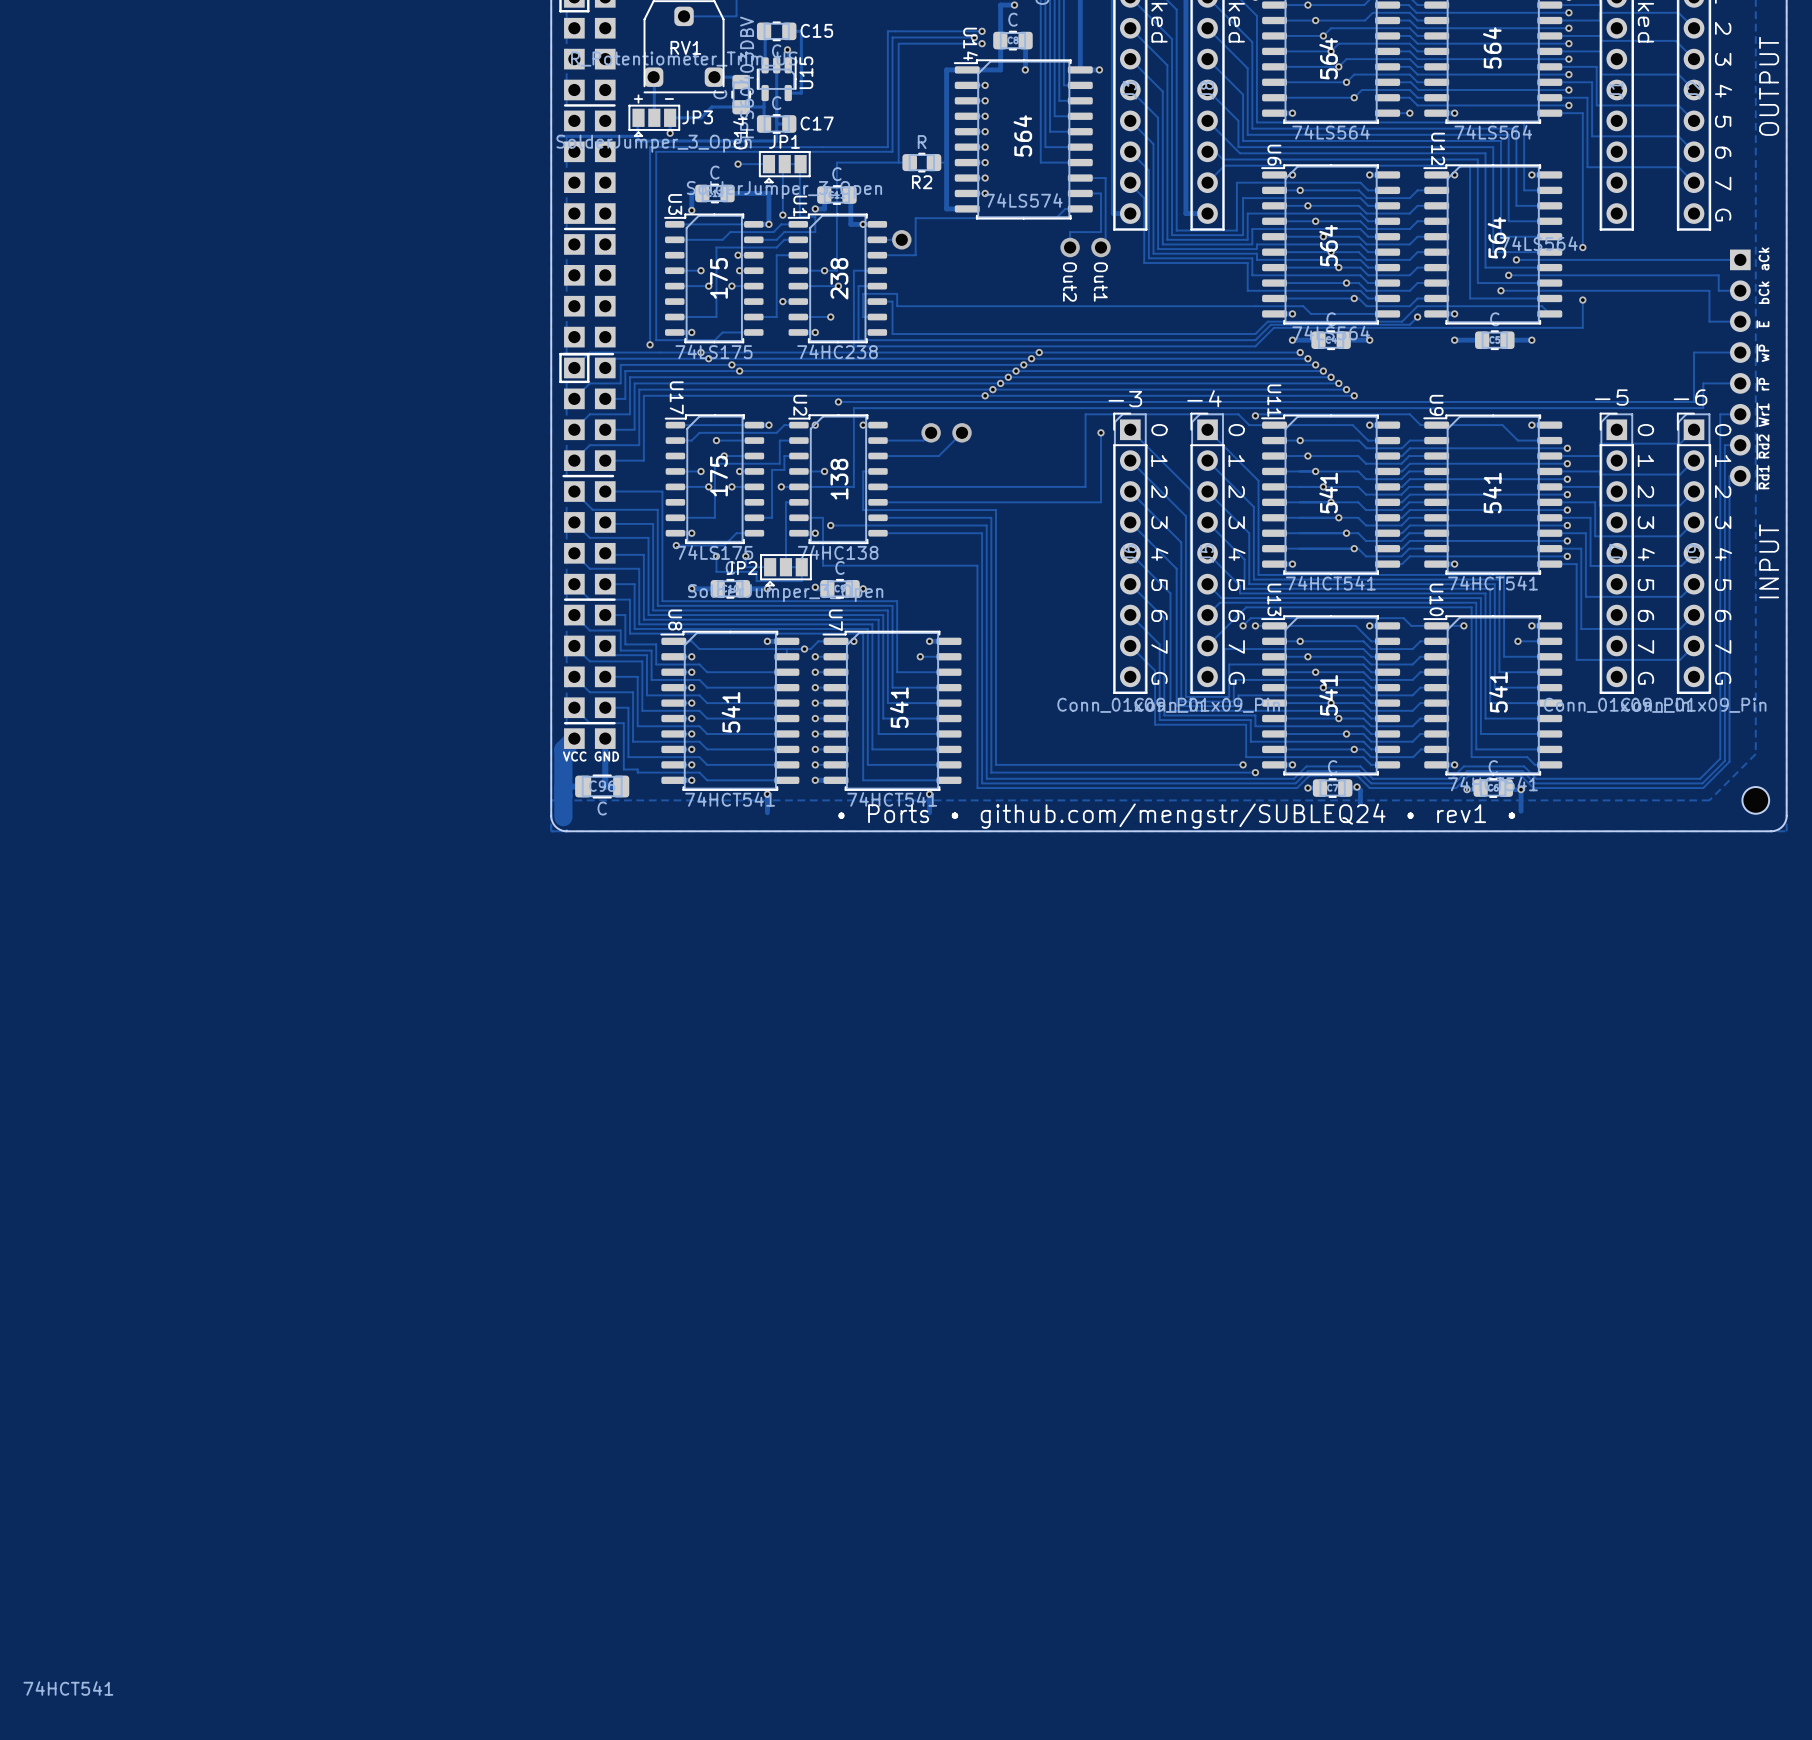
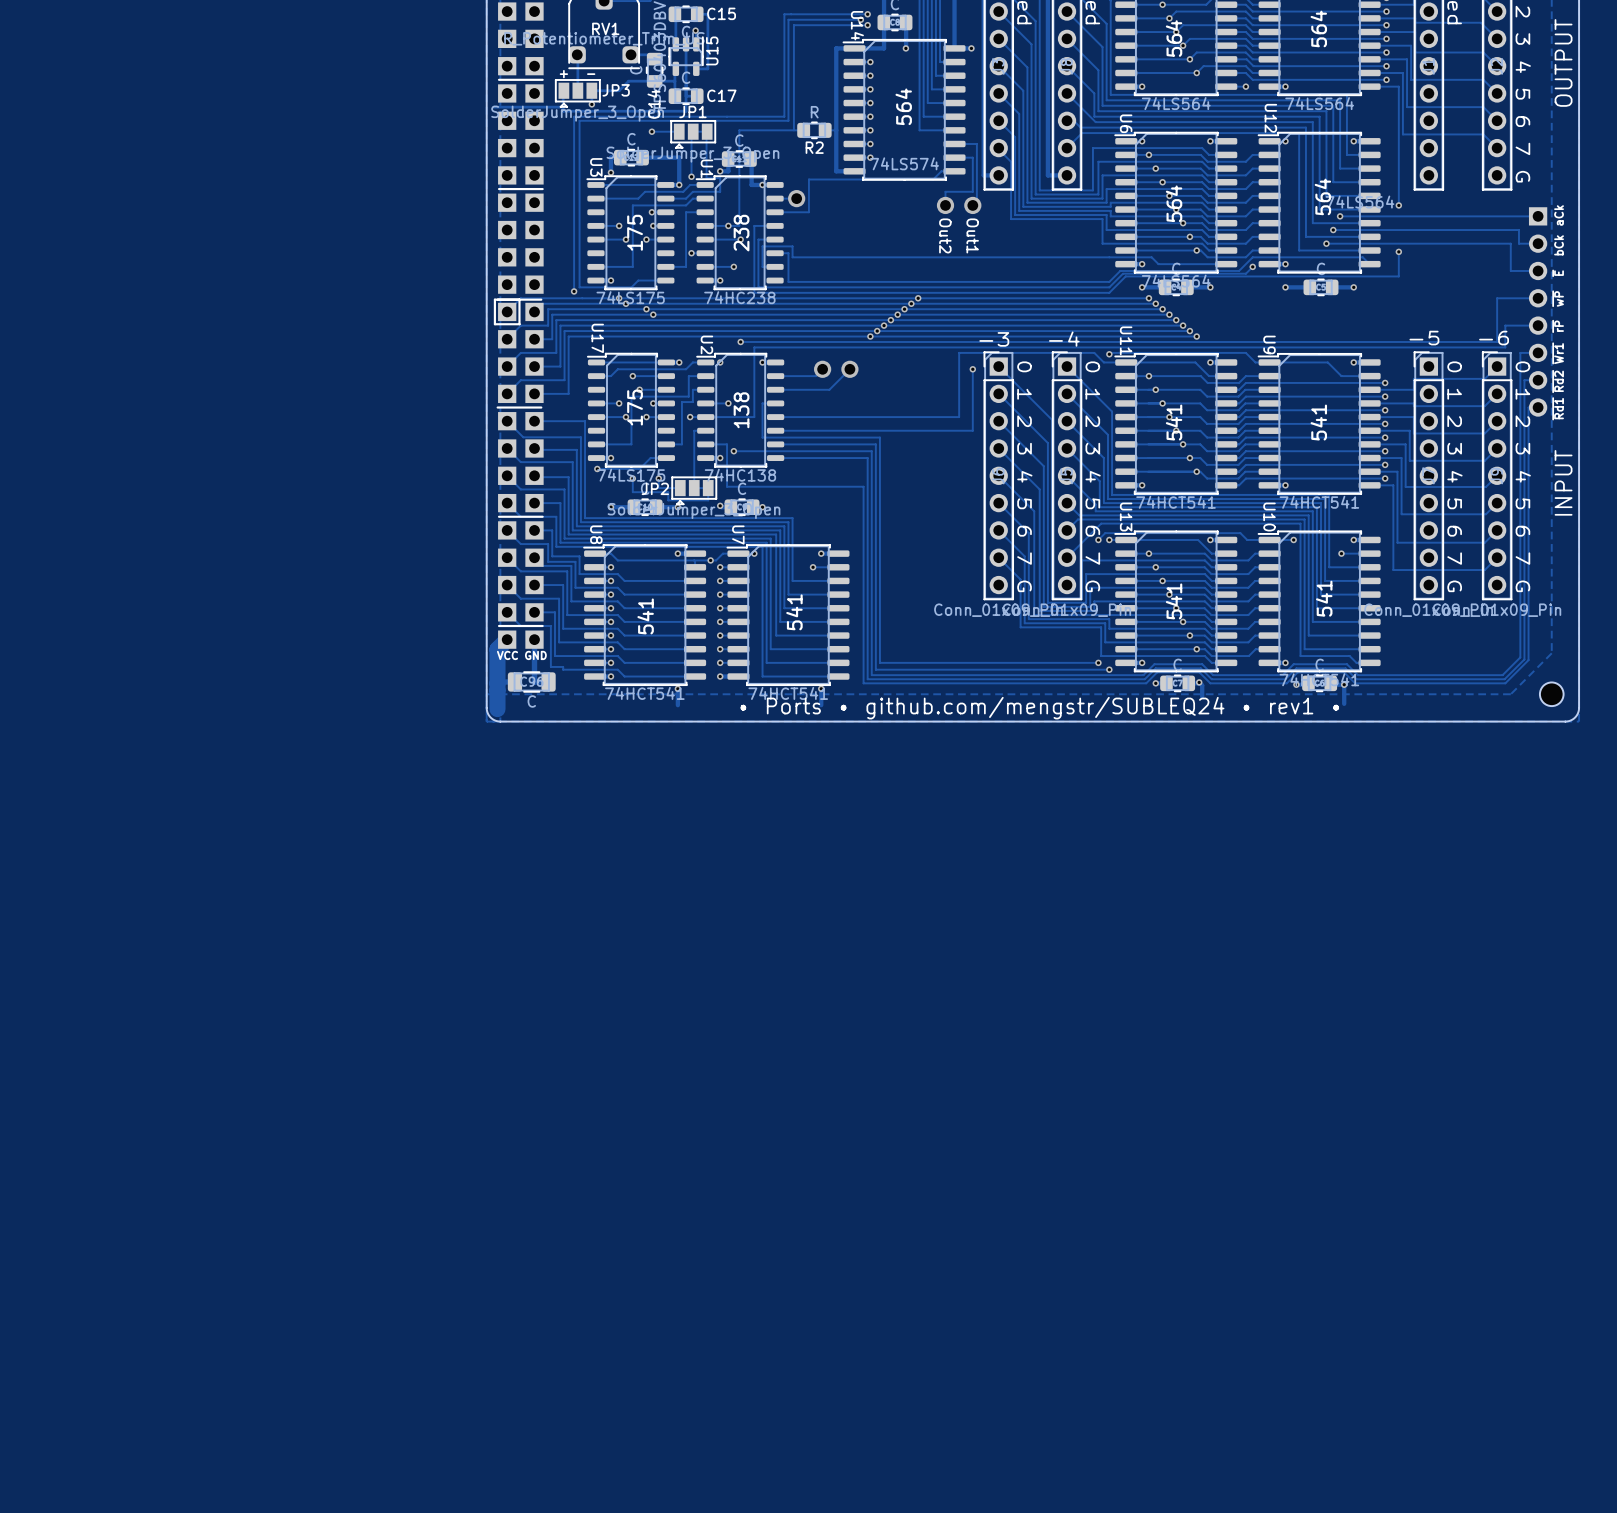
U13 value: 74HCT541 (68, 1688) -> none

